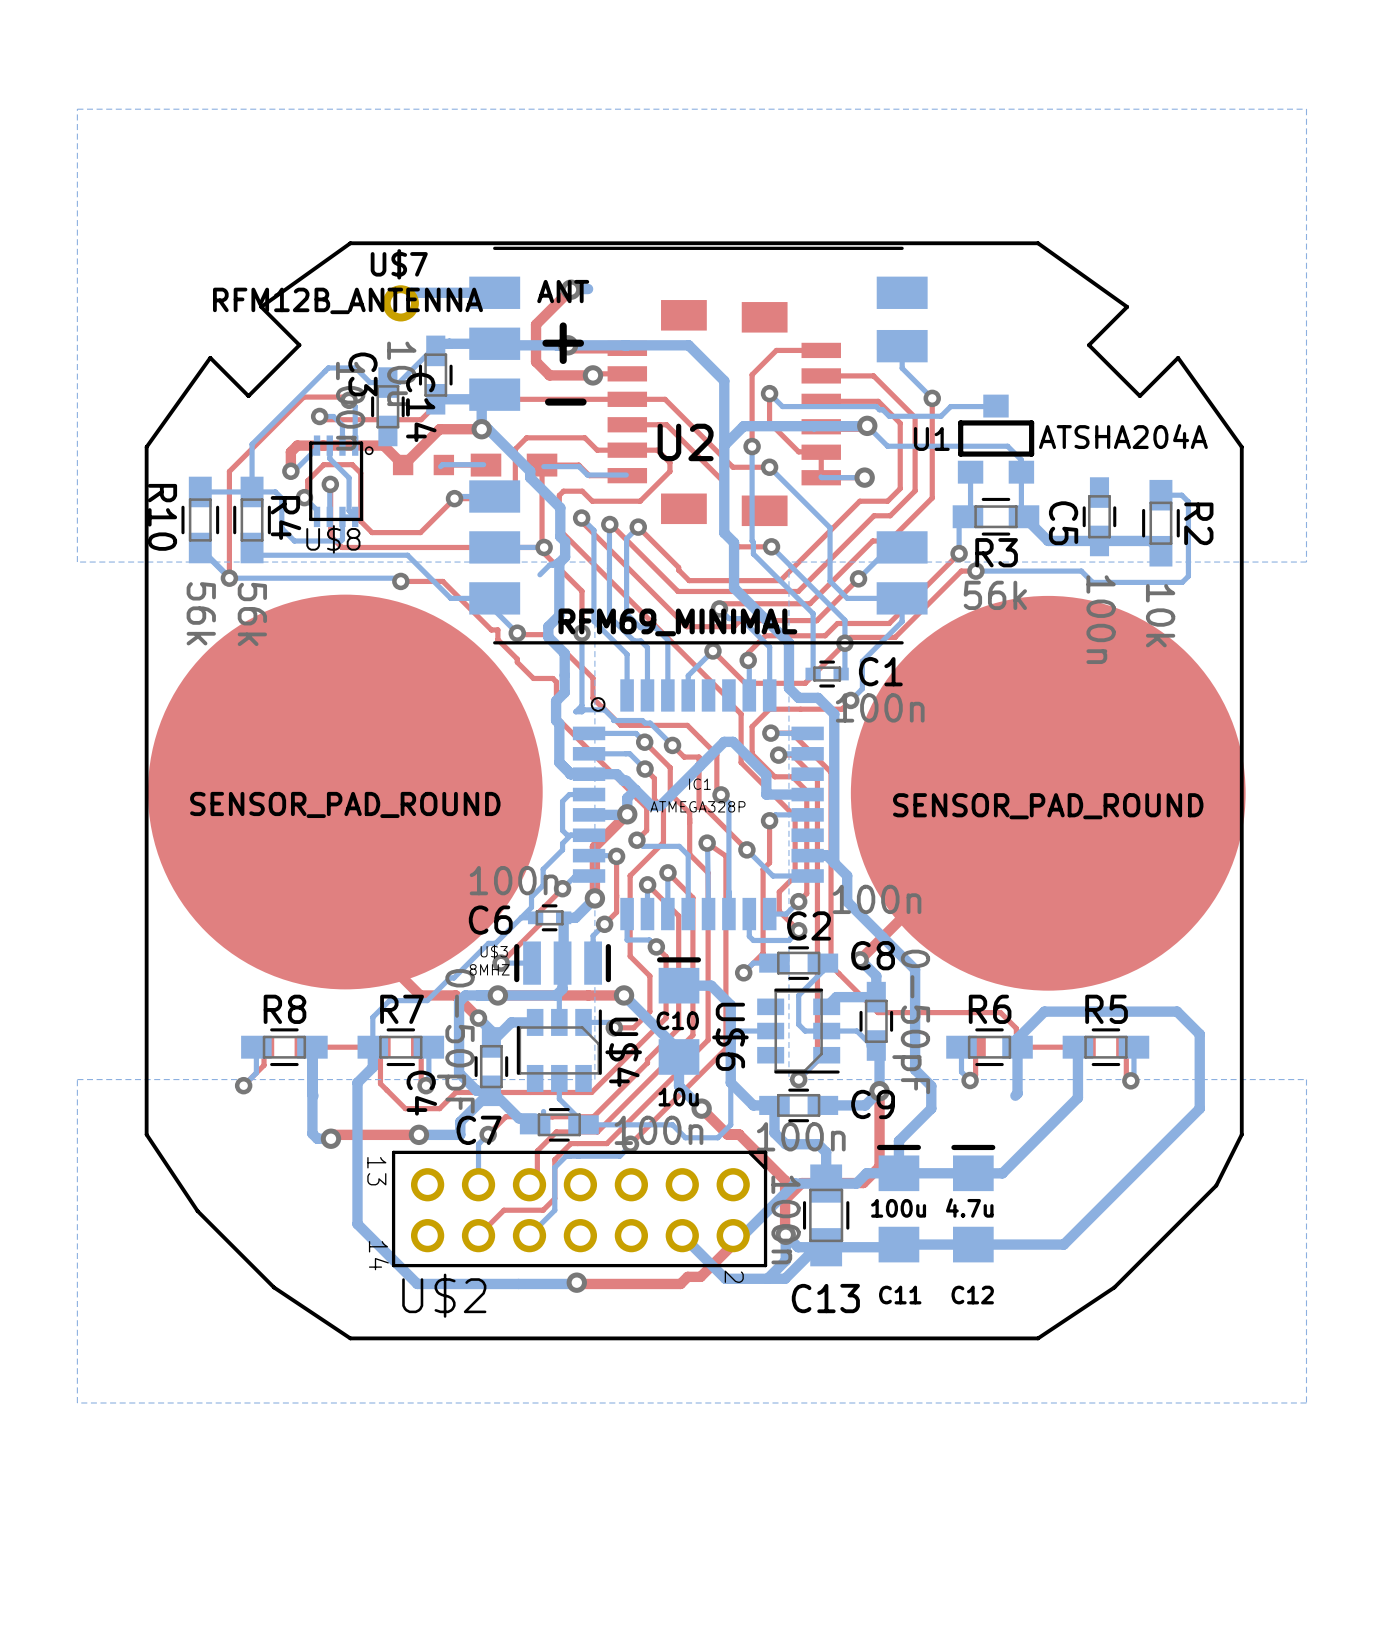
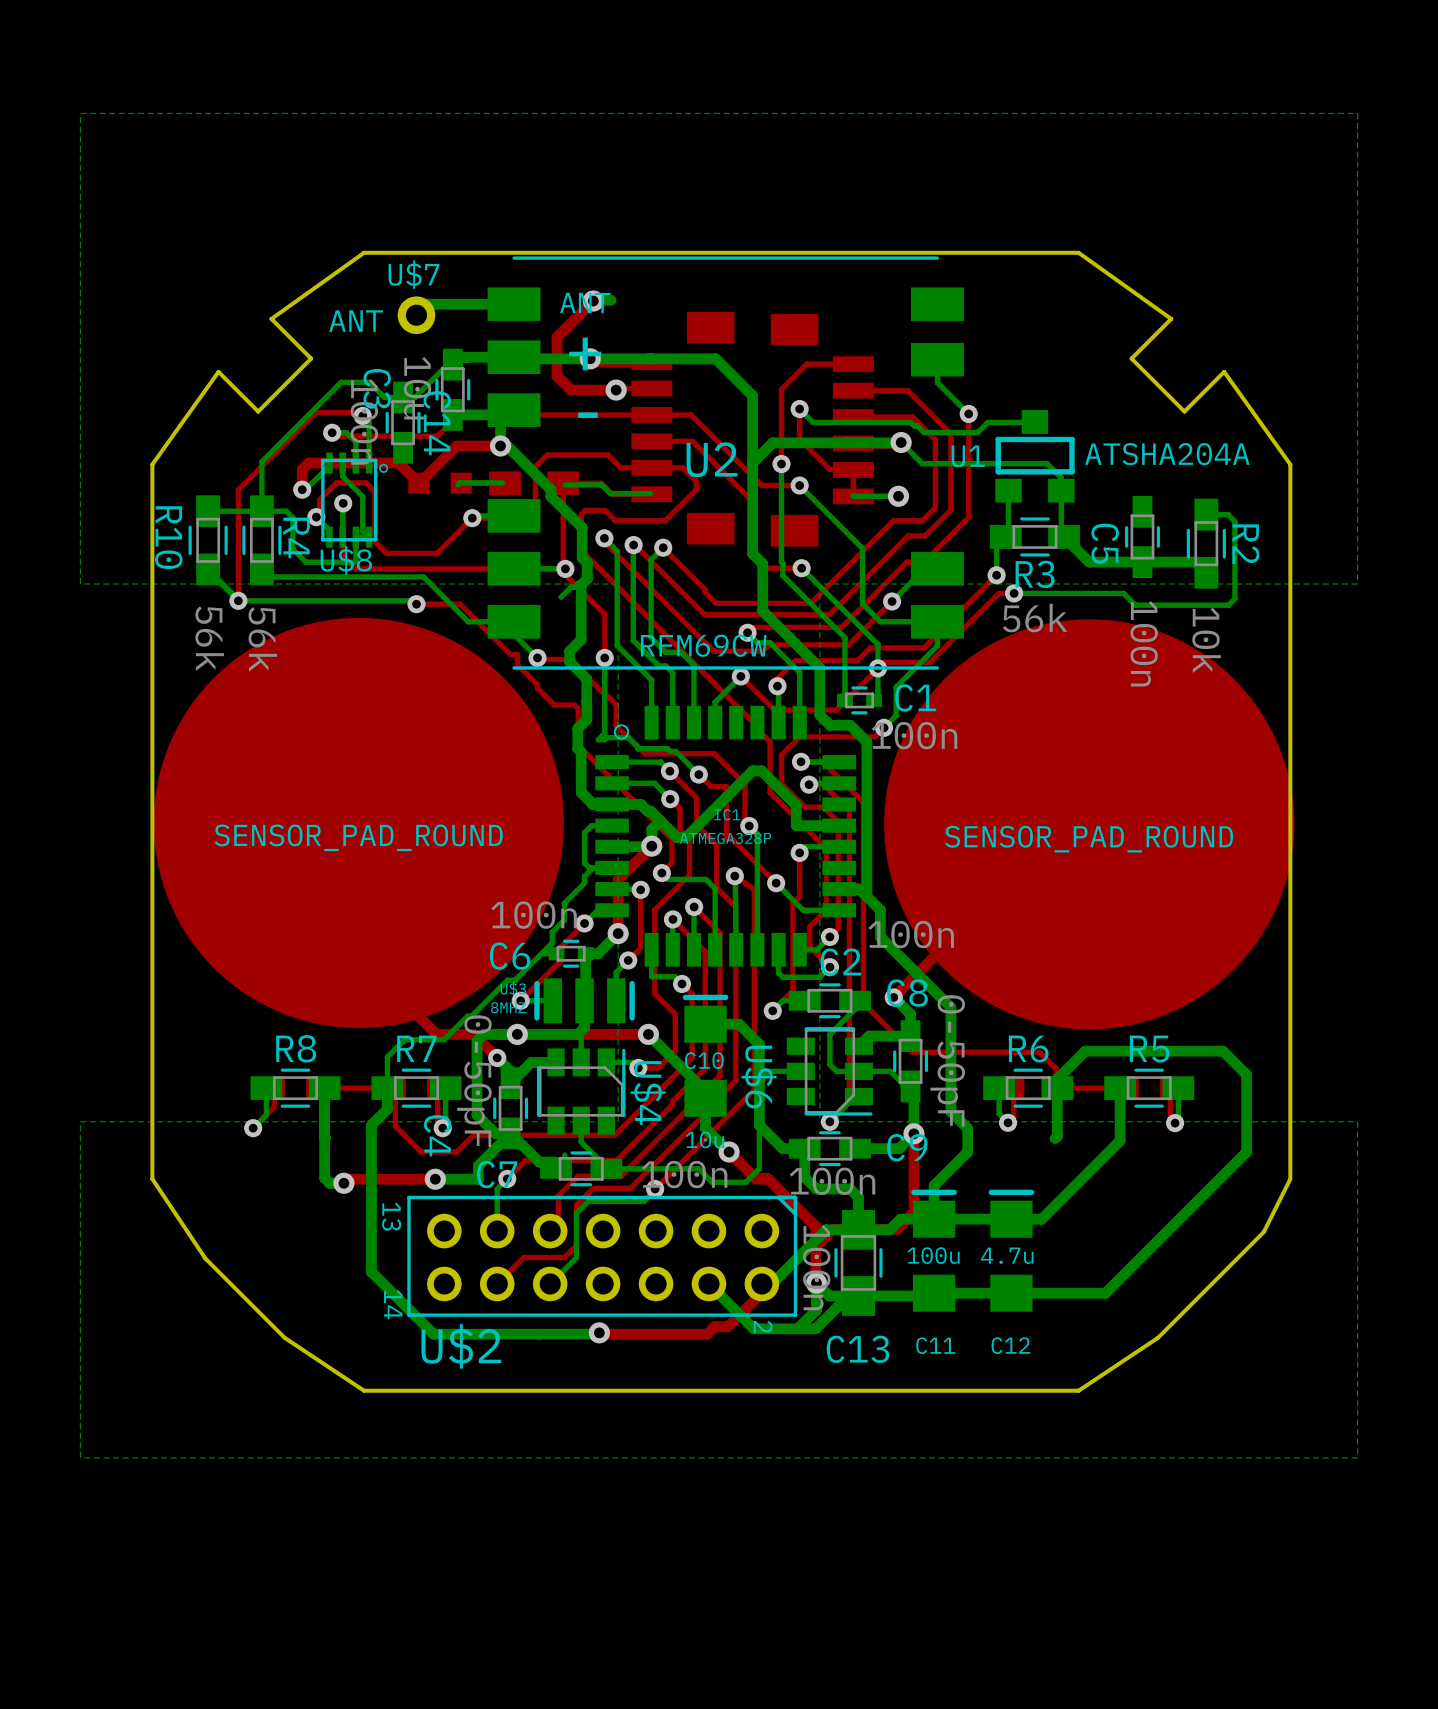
U$7 value: RFM12B_ANTENNA (347, 300) -> ANT (356, 321)
U2 value: RFM69_MINIMAL (677, 622) -> RFM69CW (703, 645)

